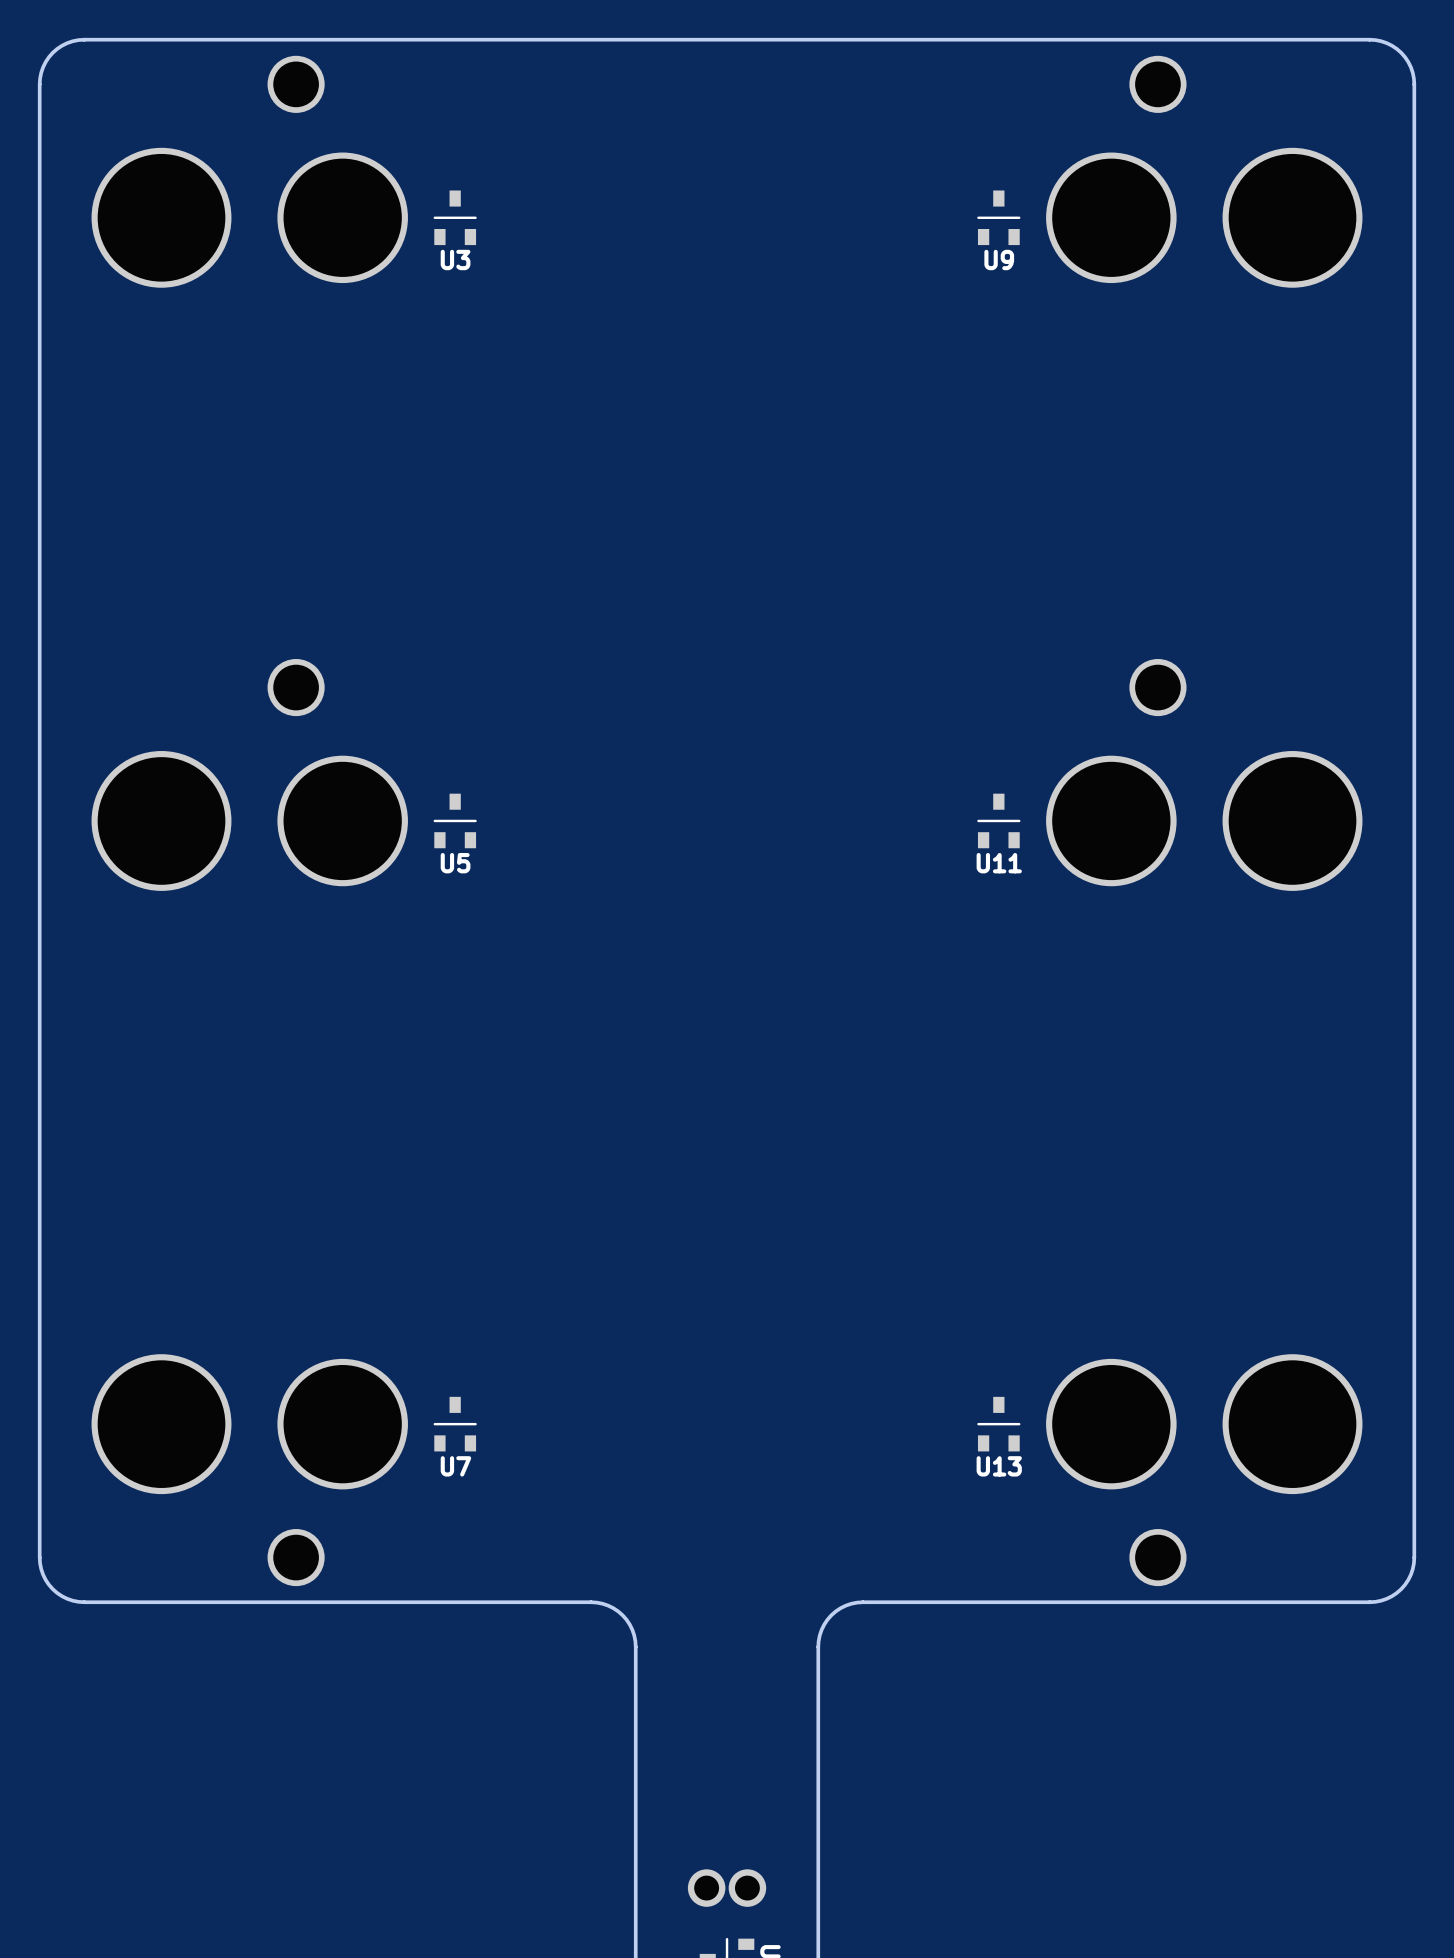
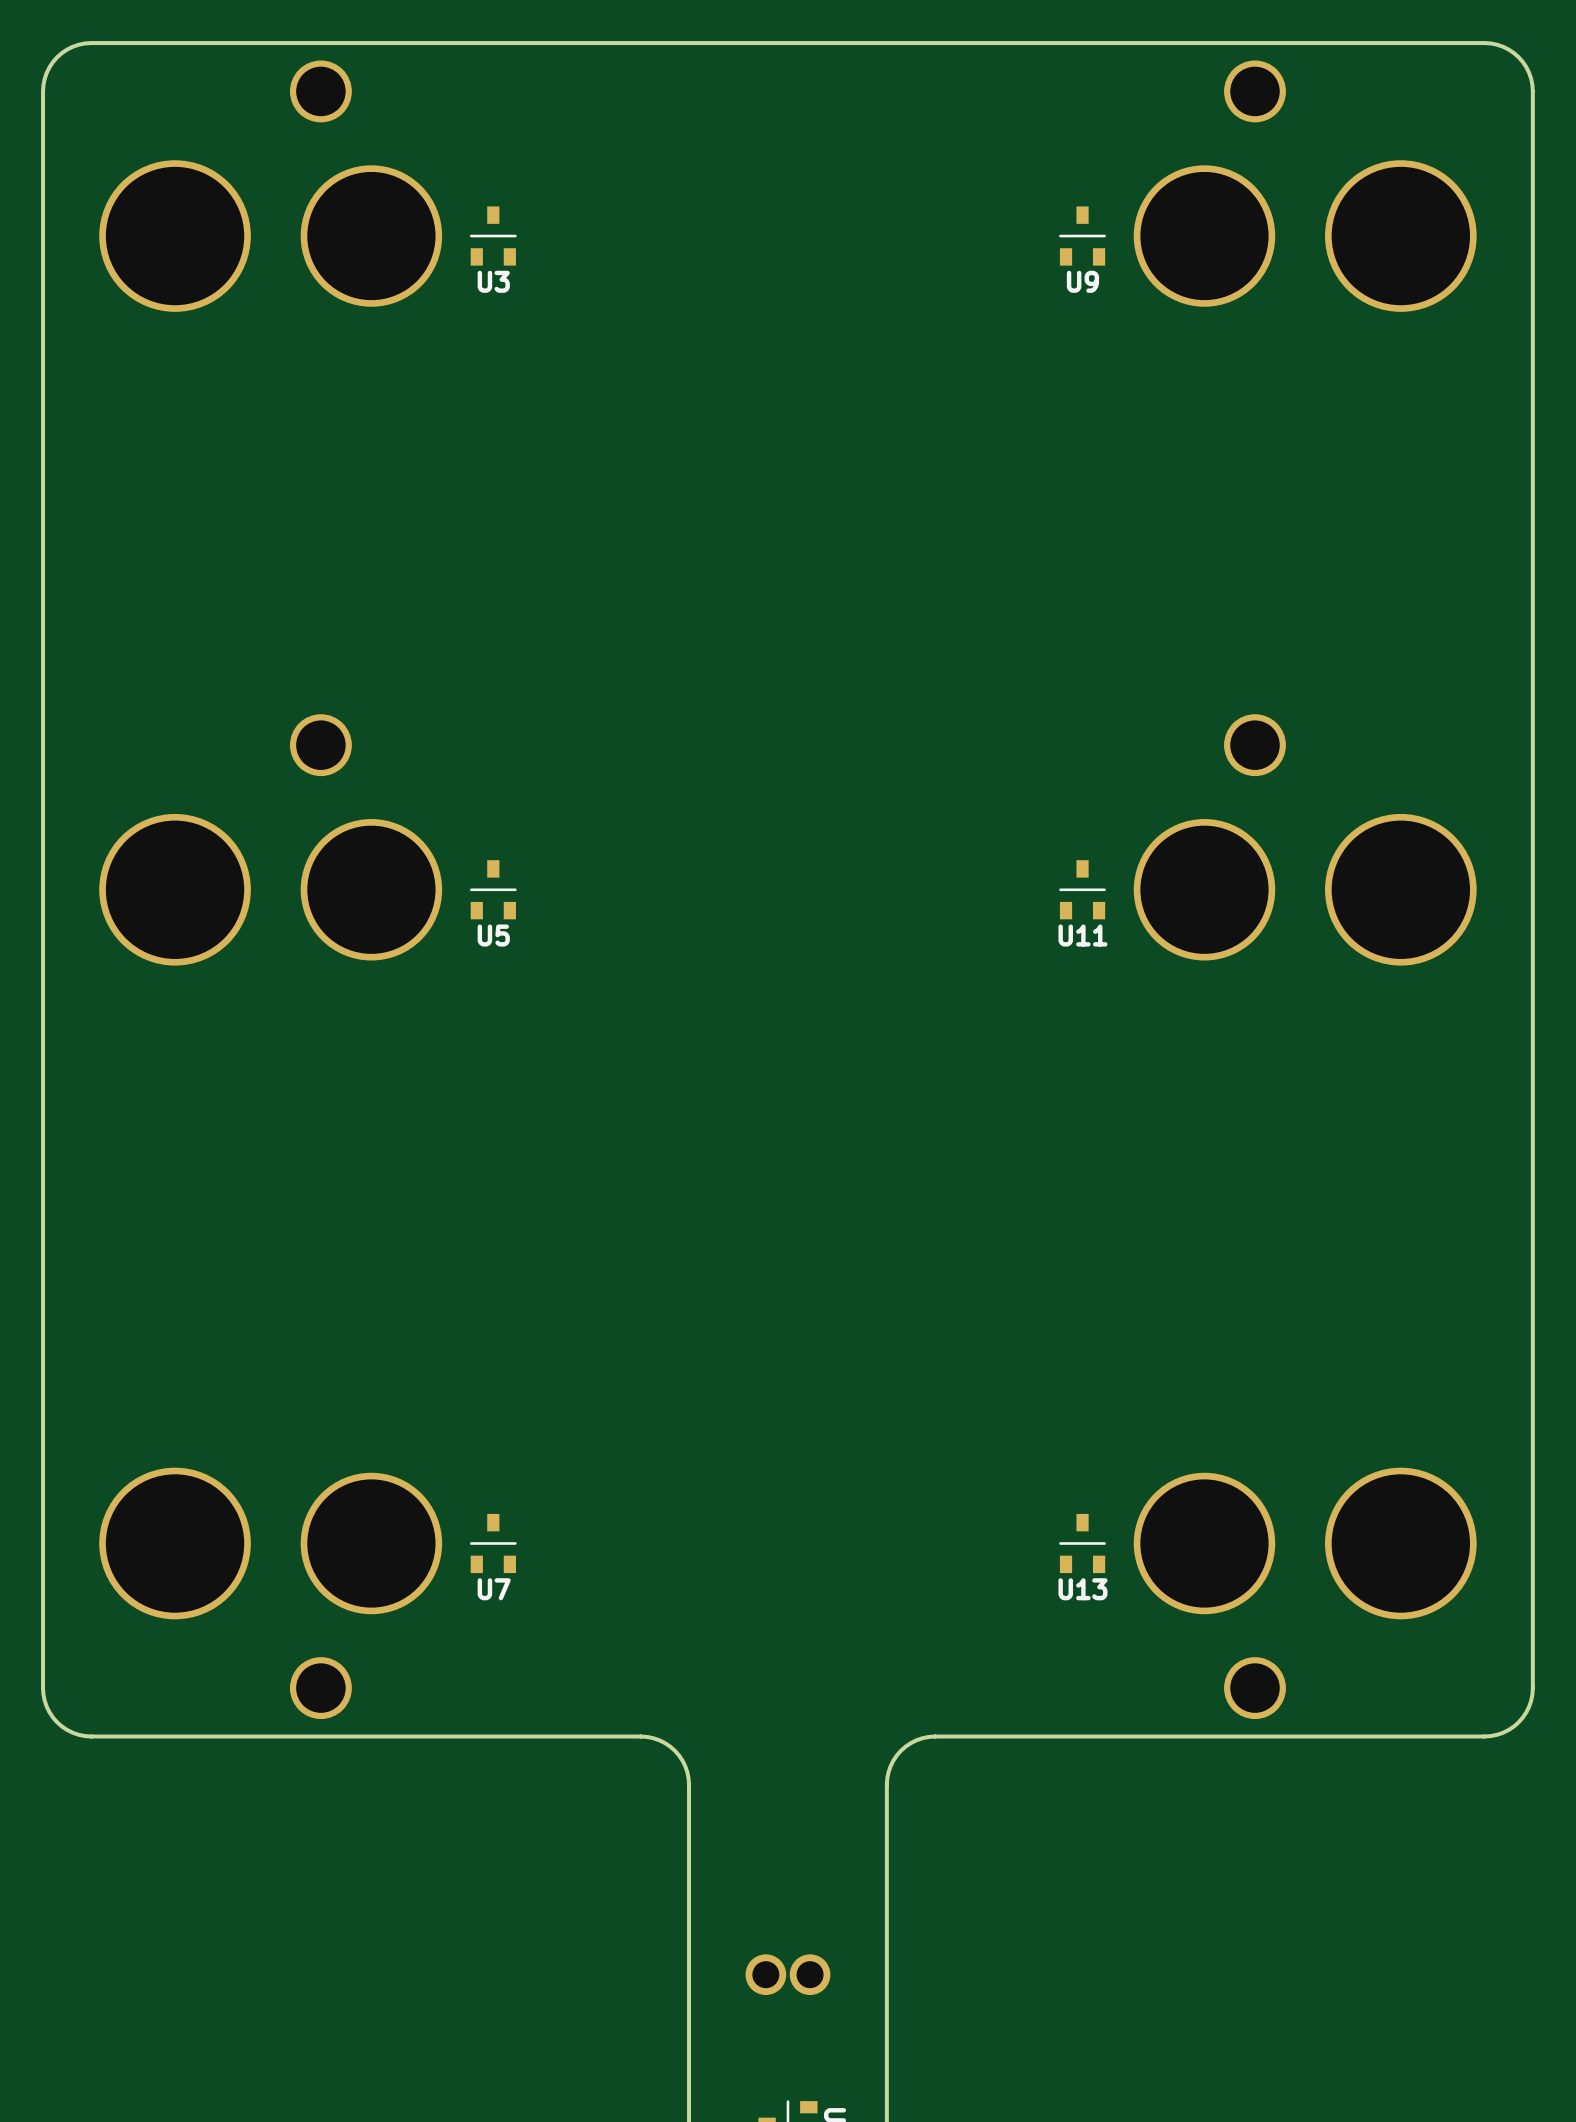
part position: (727, 1888) -> (787, 1974)

